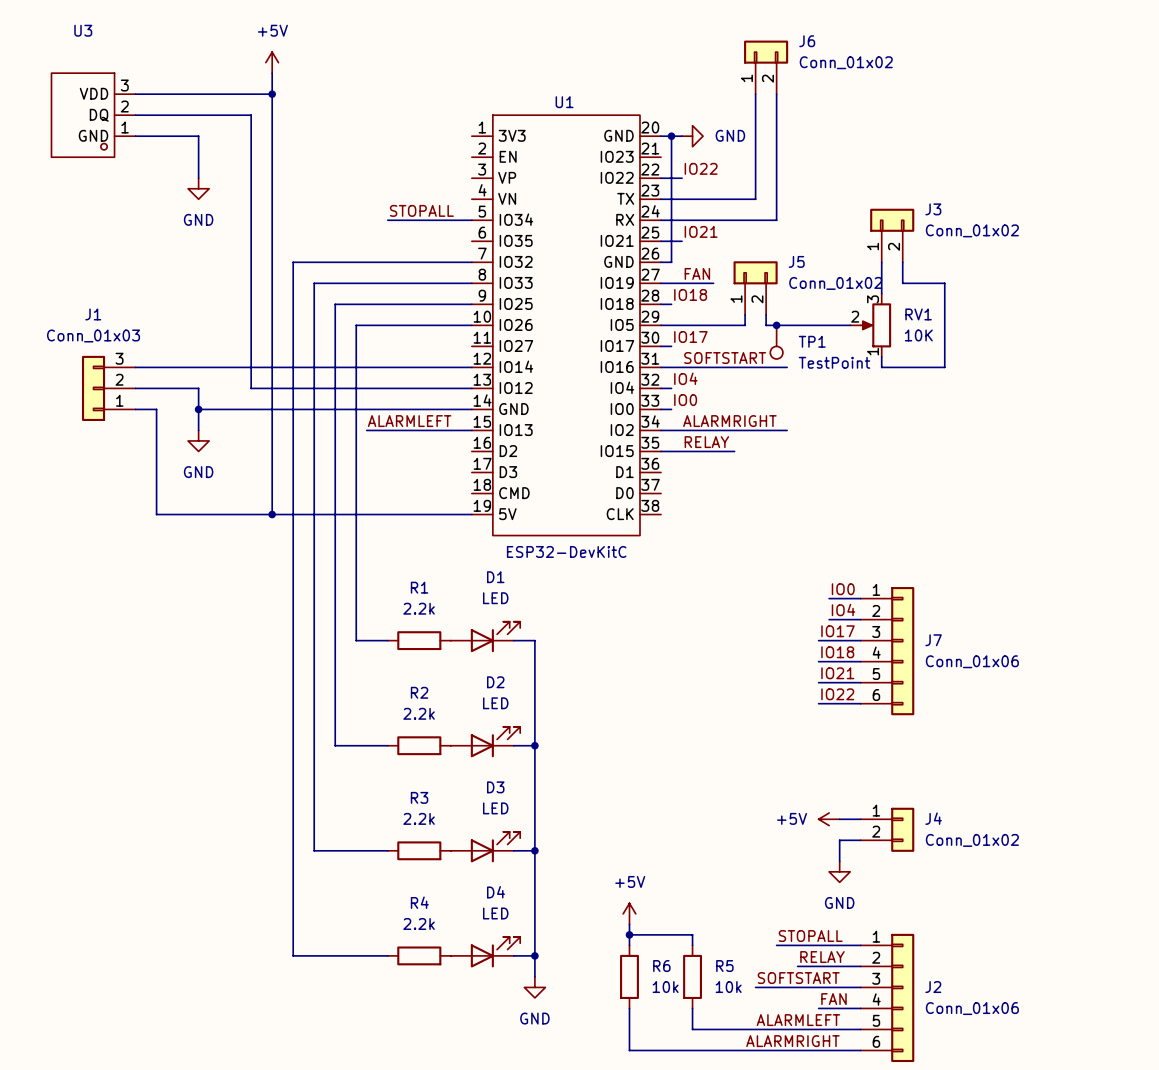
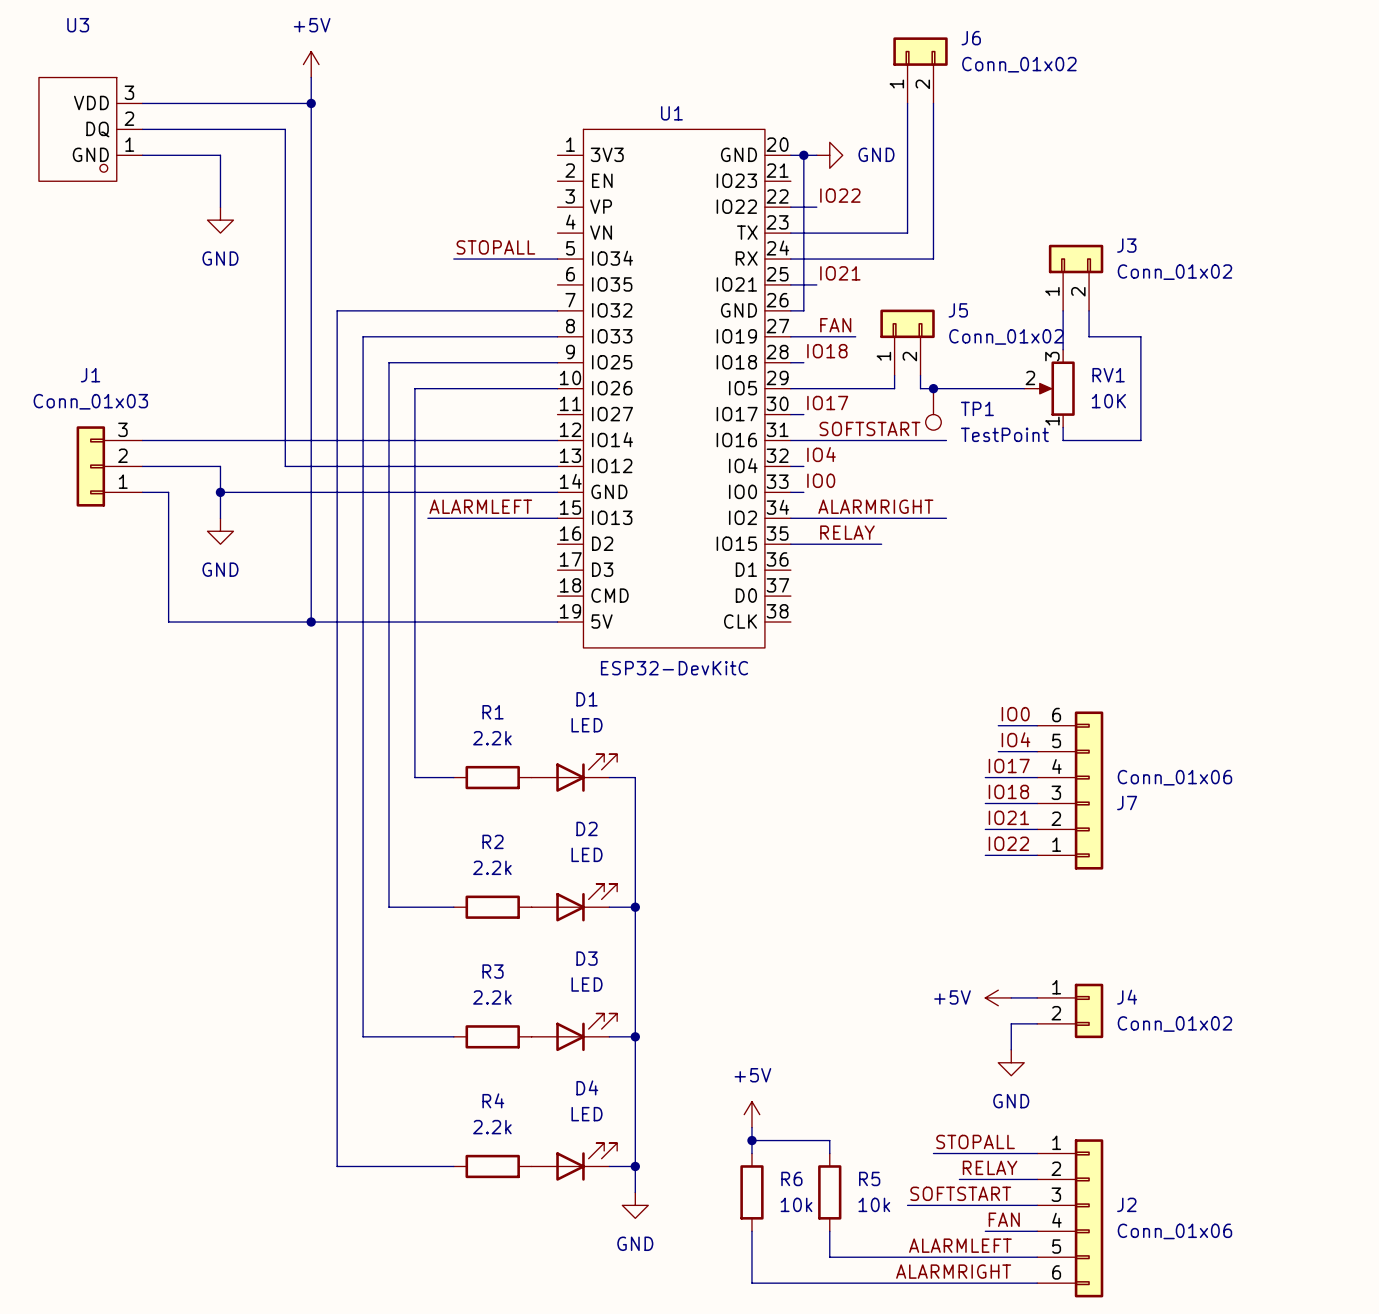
J7 flip: as is (902, 651) -> up-down (1089, 790)

